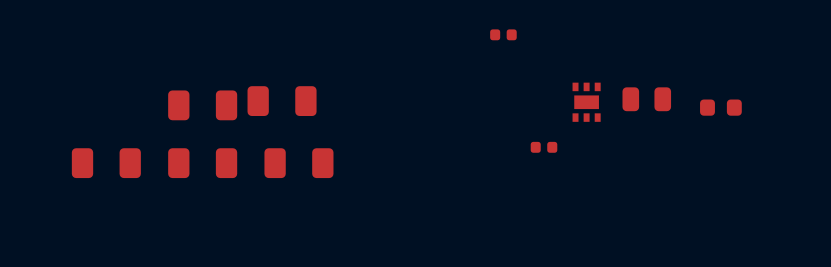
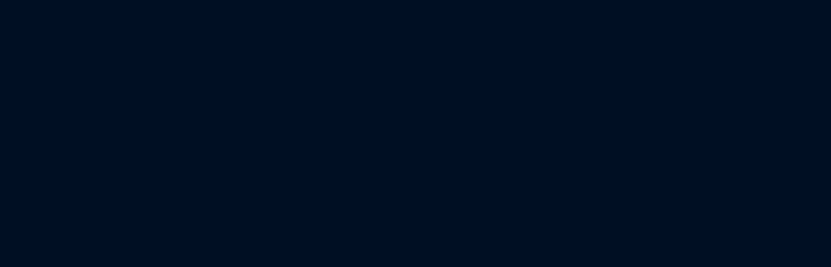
part: (503, 34) -> none
part: (646, 99) -> none
part: (282, 101) -> none
part: (586, 102) -> none
part: (202, 105) -> none
part: (720, 107) -> none
part: (543, 147) -> none
part: (106, 163) -> none
part: (202, 163) -> none
part: (298, 163) -> none

